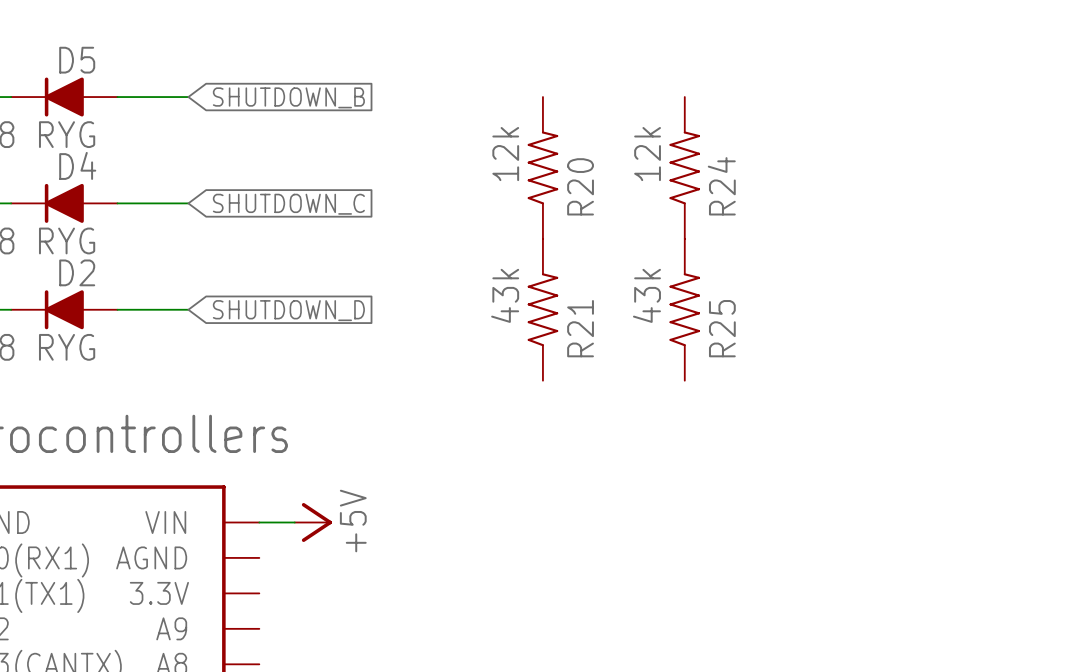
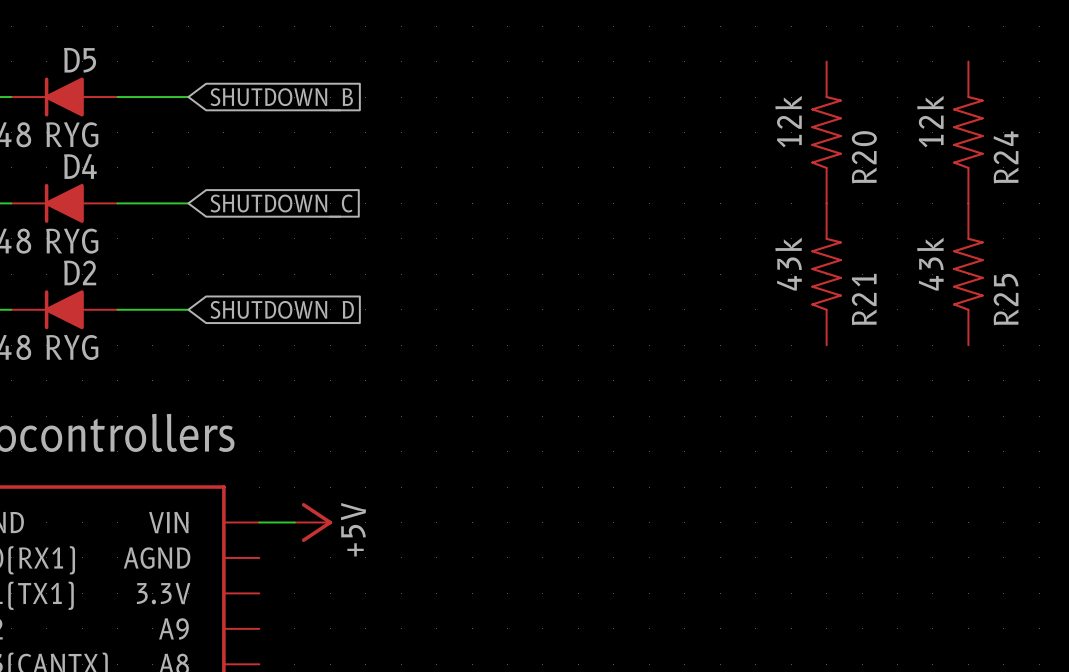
R20 position: (542, 167) -> (826, 132)
R24 position: (684, 167) -> (968, 132)
R21 position: (542, 309) -> (826, 274)
R25 position: (684, 309) -> (968, 274)

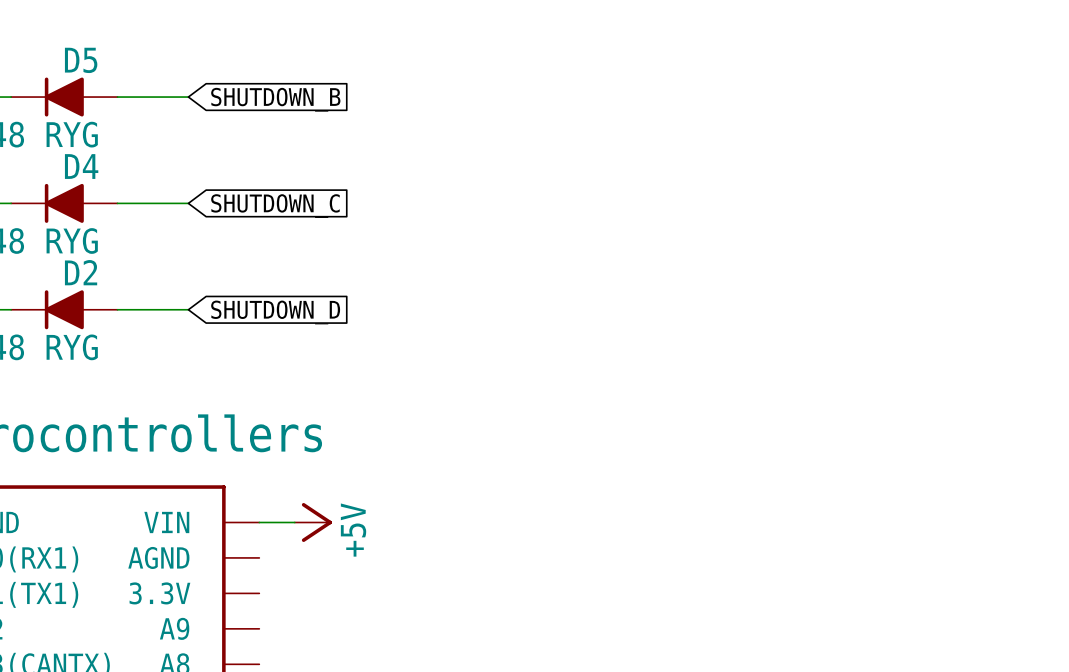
R20: 12k (826, 132) -> none
R24: 12k (968, 132) -> none
R21: 43k (826, 274) -> none
R25: 43k (968, 274) -> none

